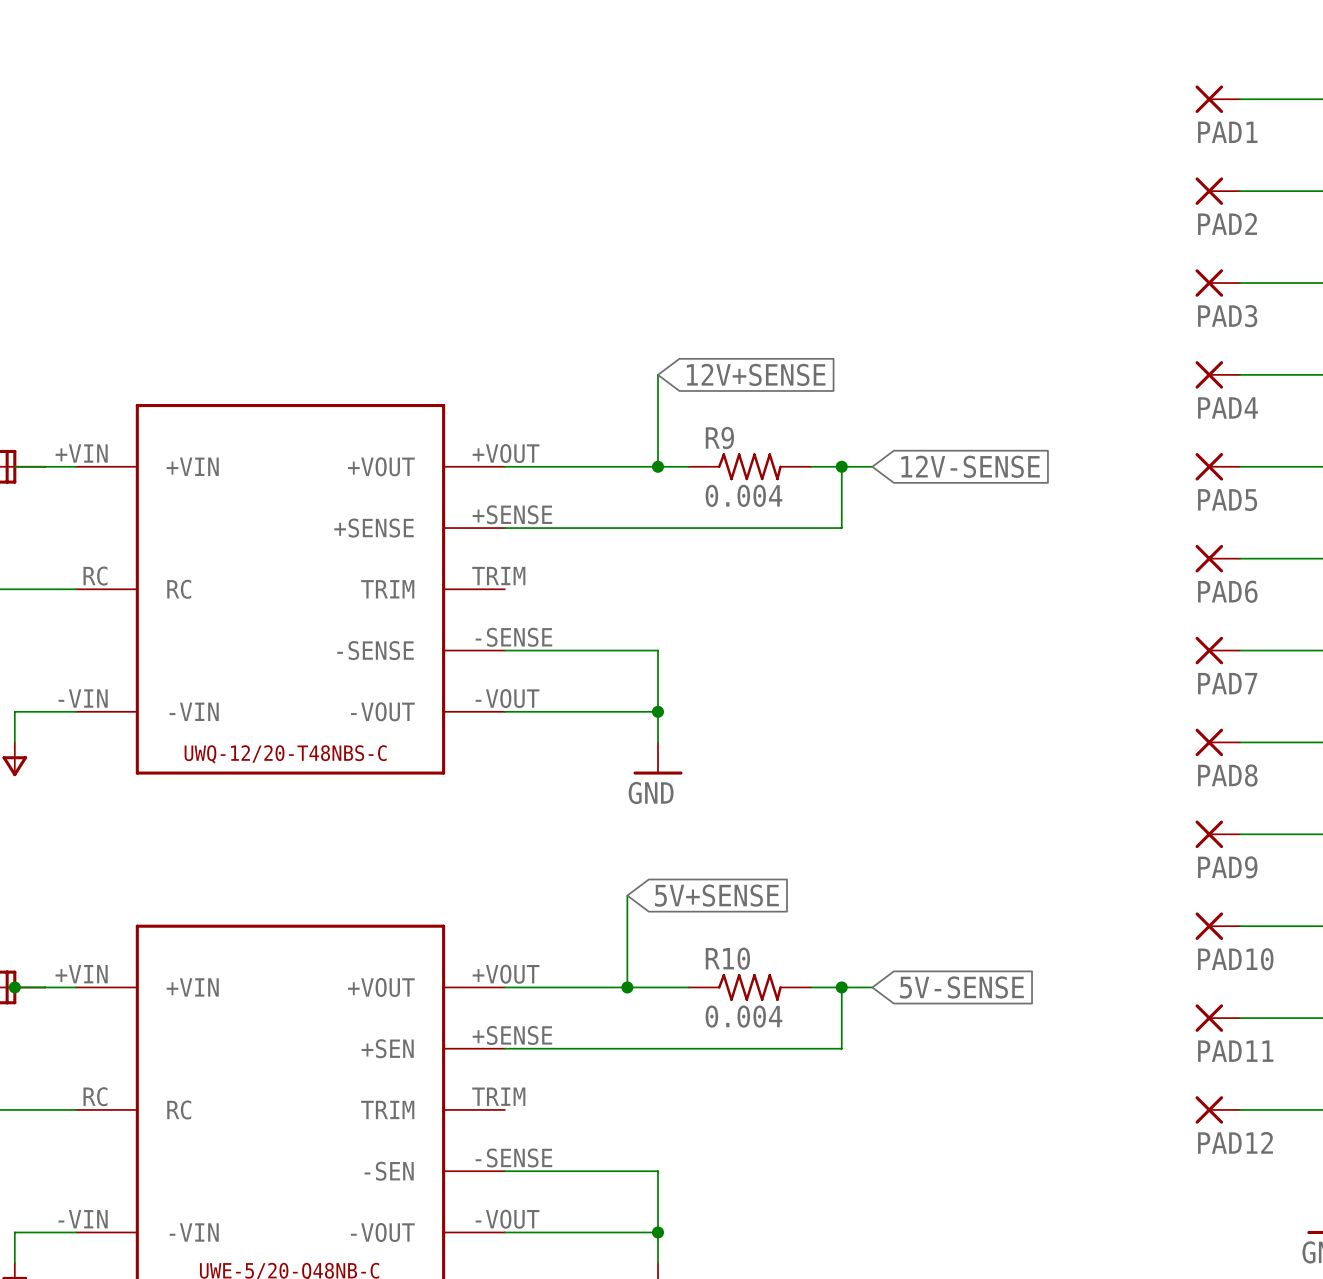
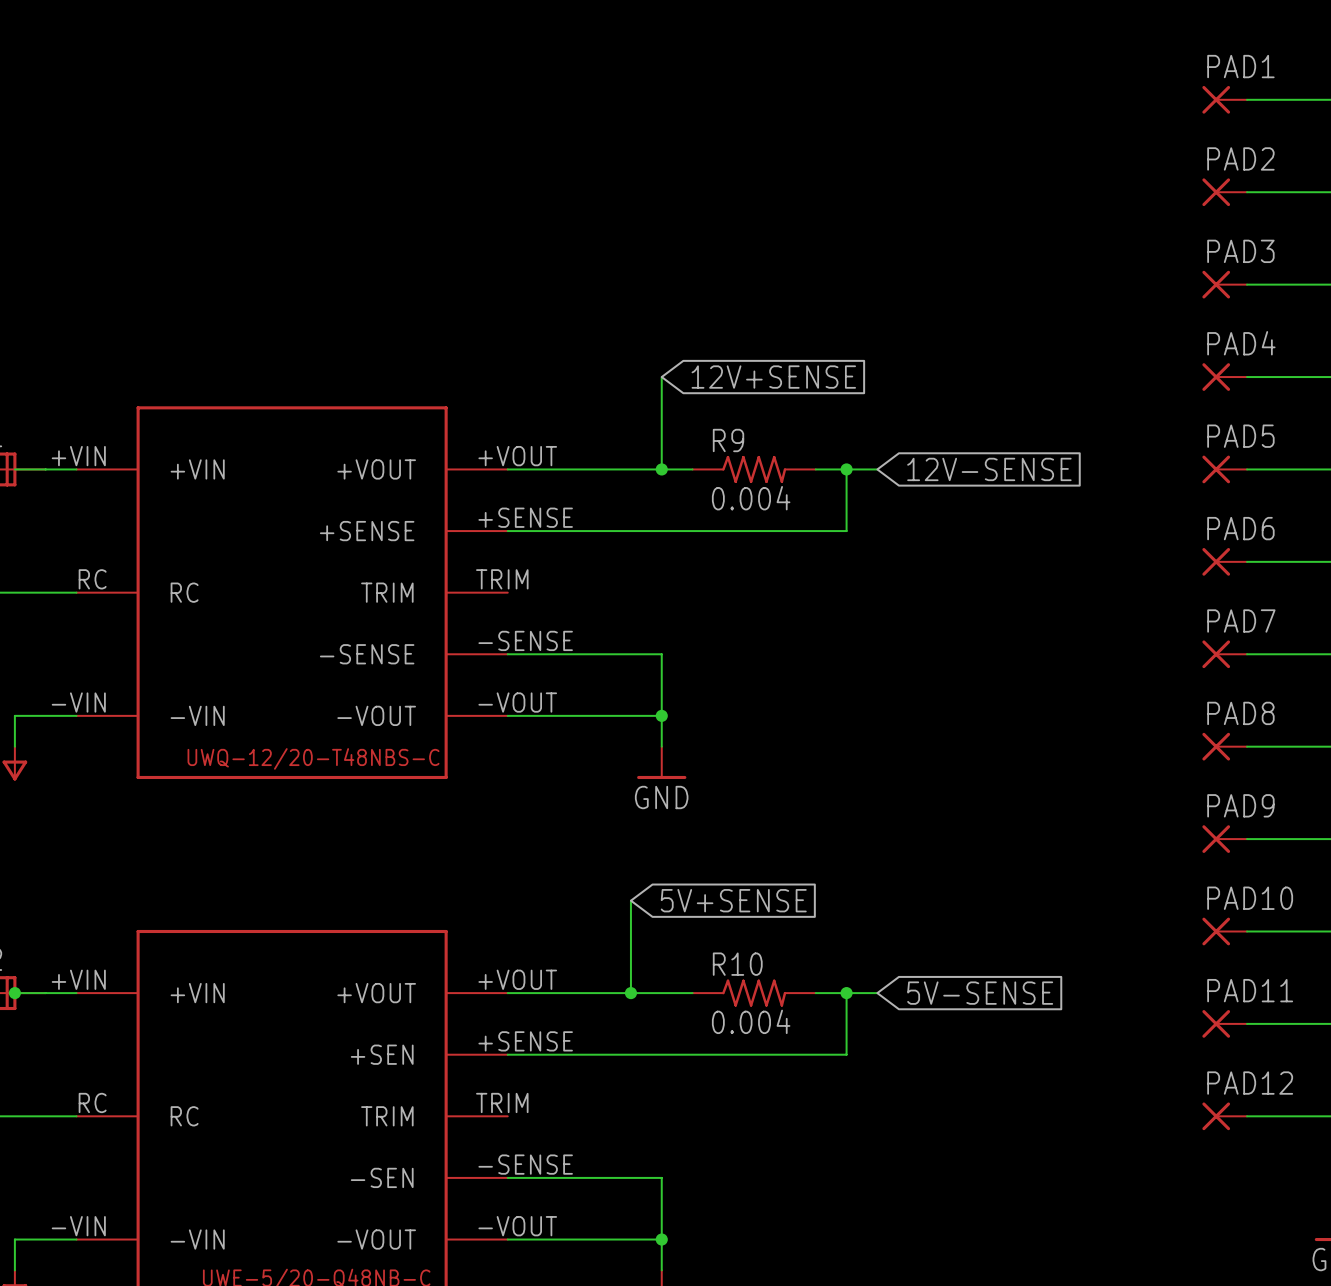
PAD1 name position: PAD1 (1227, 132) -> PAD1 (1240, 66)
PAD2 name position: PAD2 (1227, 224) -> PAD2 (1240, 158)
PAD3 name position: PAD3 (1227, 316) -> PAD3 (1240, 251)
PAD4 name position: PAD4 (1228, 407) -> PAD4 (1241, 343)
PAD5 name position: PAD5 (1227, 500) -> PAD5 (1240, 436)
PAD6 name position: PAD6 (1227, 591) -> PAD6 (1240, 528)
PAD7 name position: PAD7 (1227, 683) -> PAD7 (1241, 621)
PAD8 name position: PAD8 (1227, 775) -> PAD8 (1240, 713)
PAD9 name position: PAD9 (1227, 867) -> PAD9 (1240, 805)
PAD10 name position: PAD10 (1235, 959) -> PAD10 (1250, 898)
PAD11 name position: PAD11 (1235, 1051) -> PAD11 (1250, 990)
PAD12 name position: PAD12 (1235, 1142) -> PAD12 (1250, 1083)

